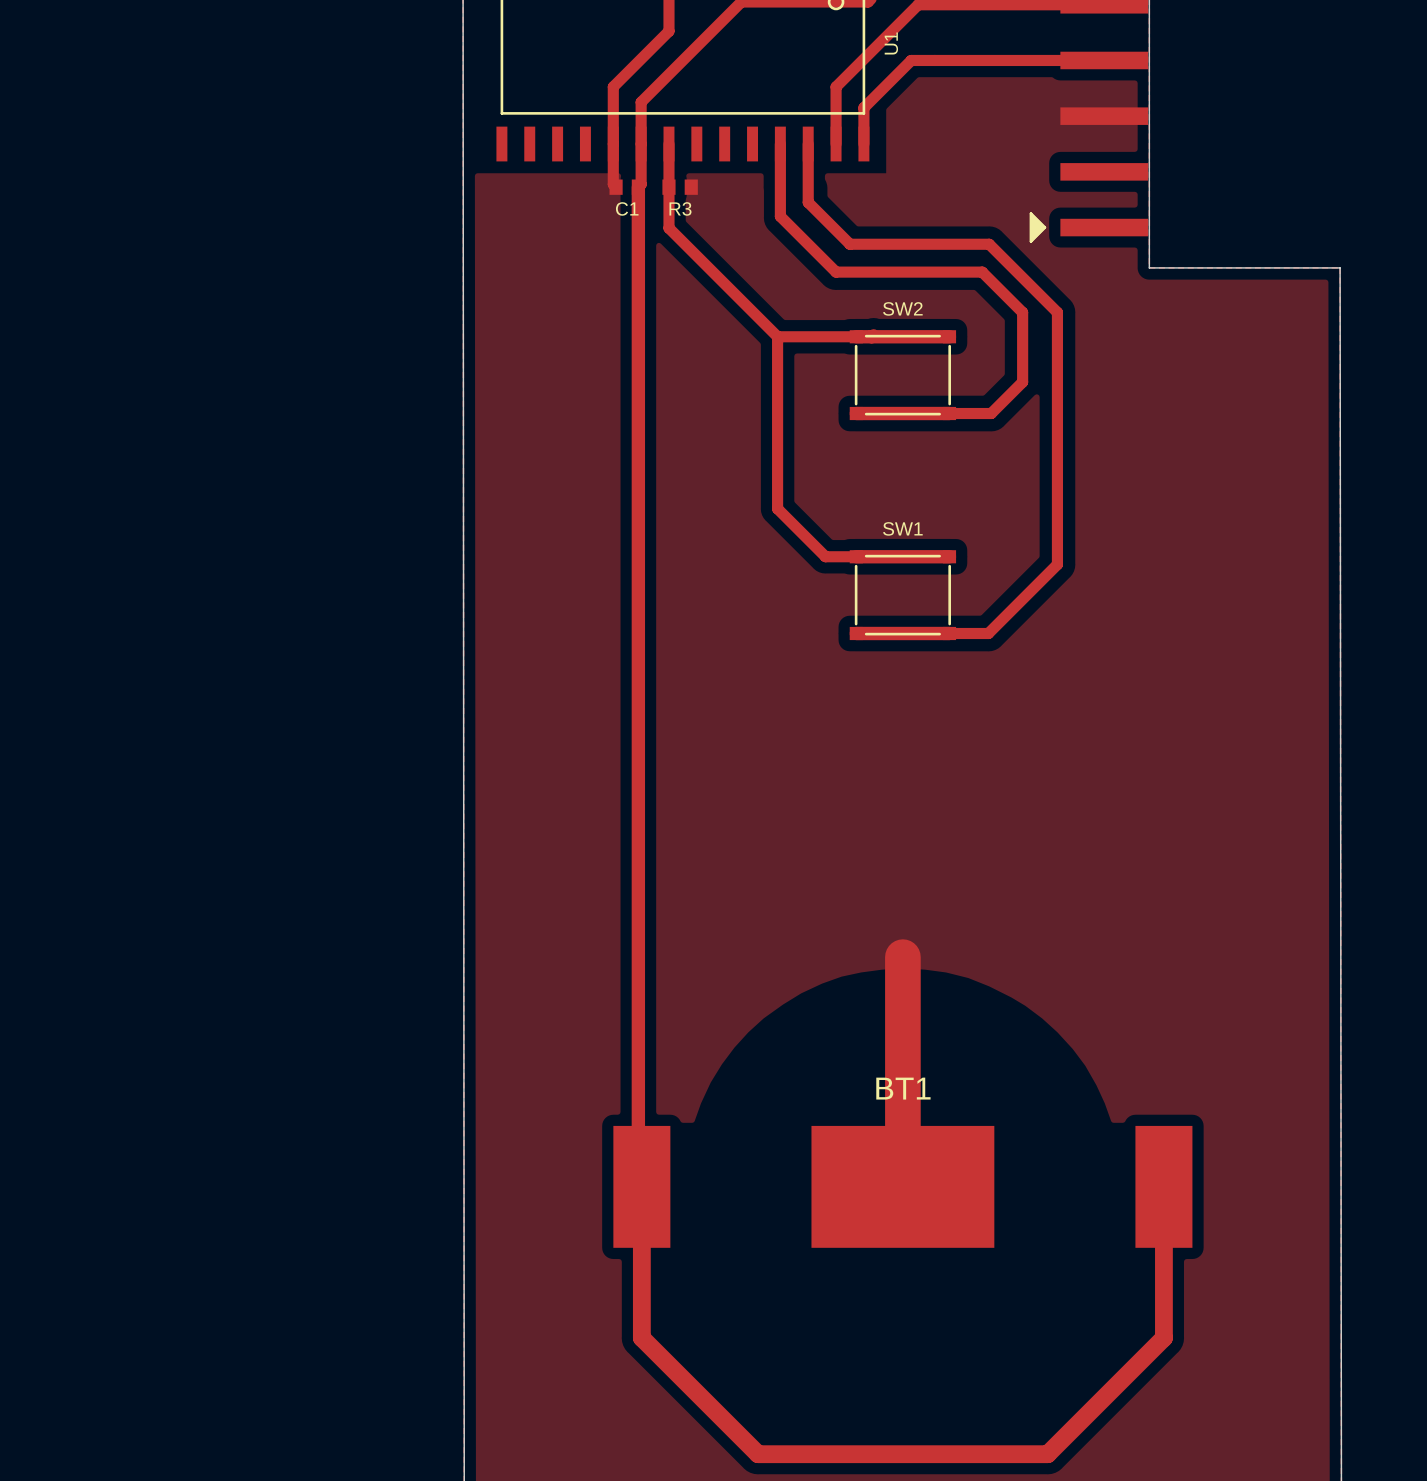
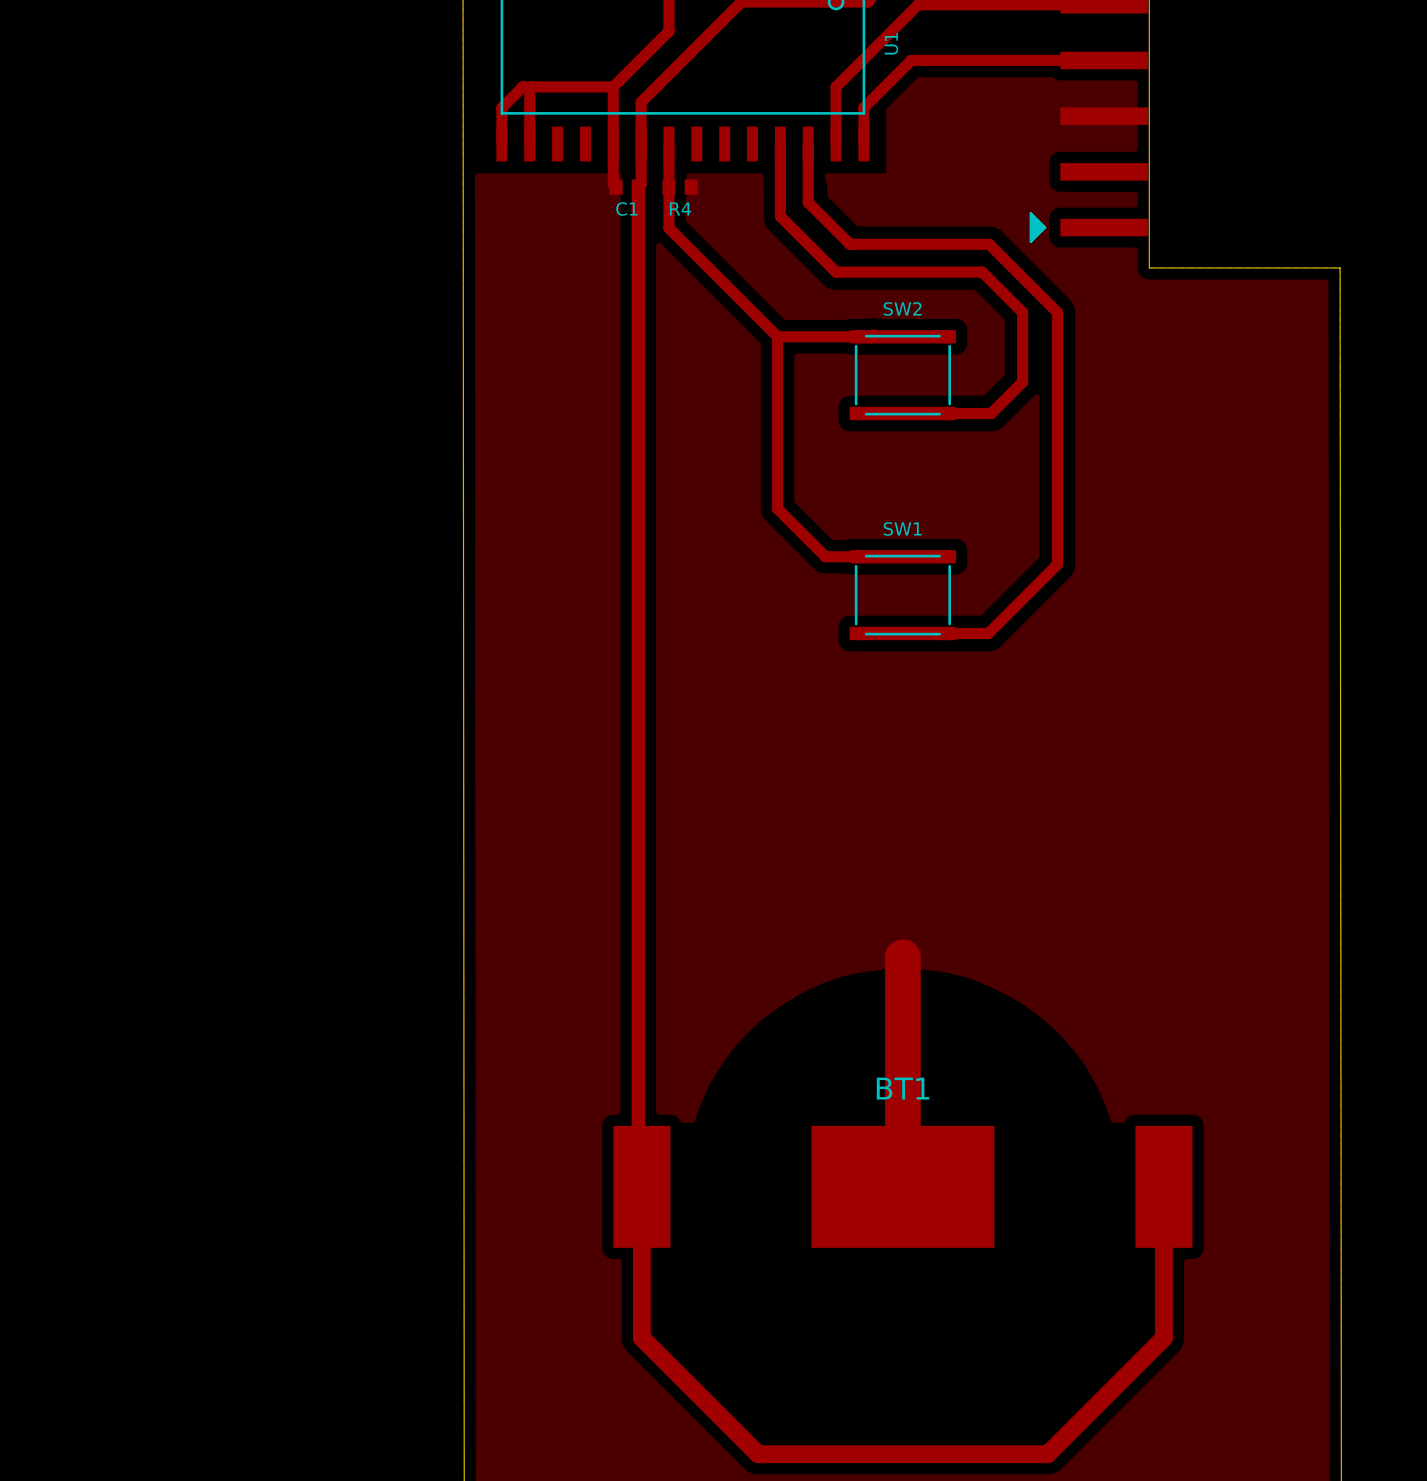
track: none -> (531, 86) (529, 144)
track: none -> (613, 86) (522, 86) (501, 107) (501, 144)
R3 name: R3 (680, 208) -> R4 (680, 208)

